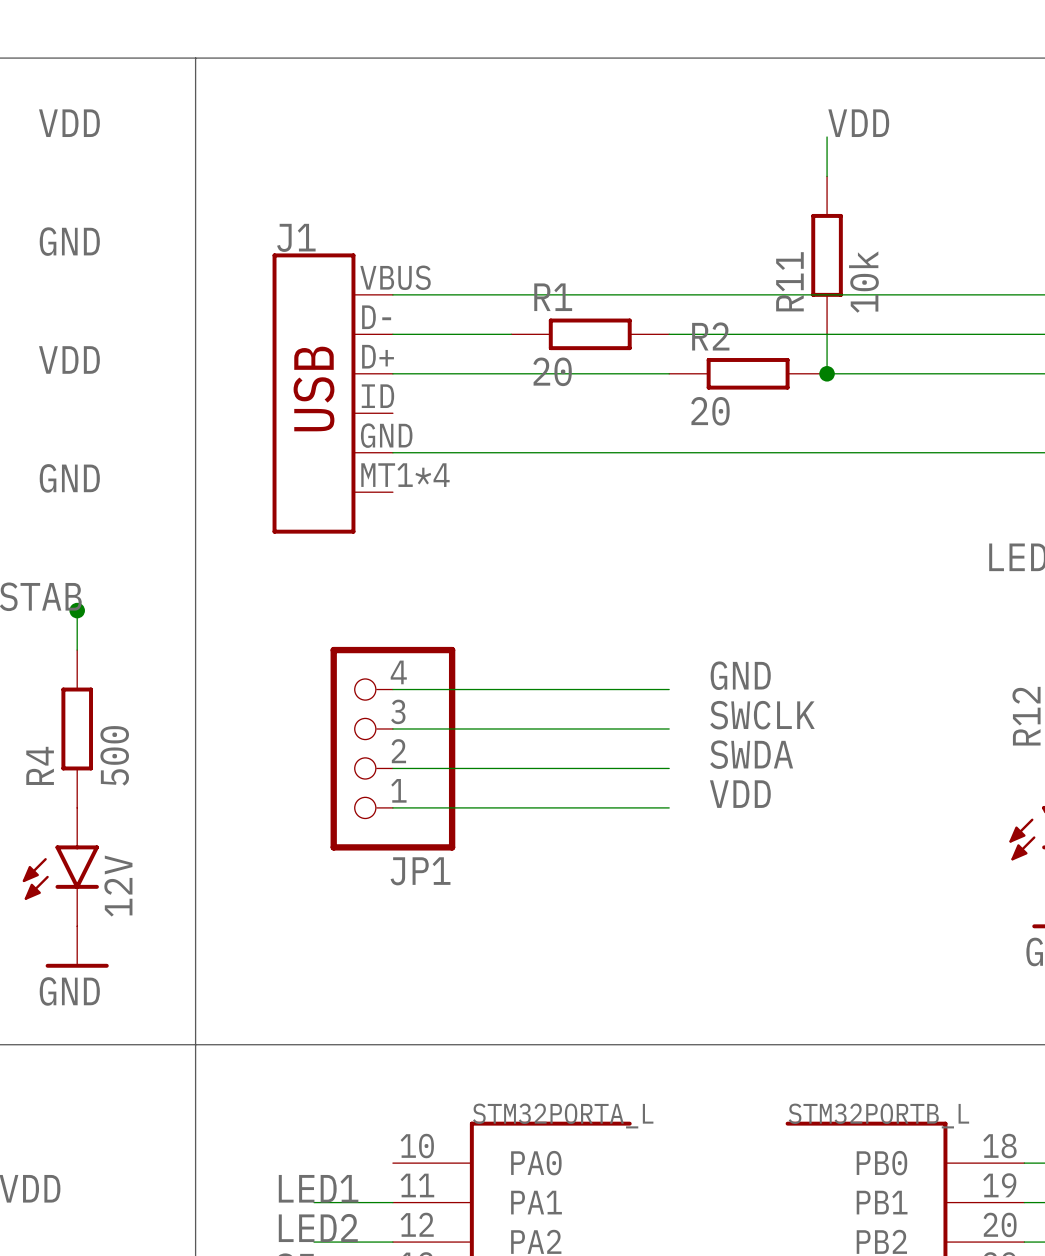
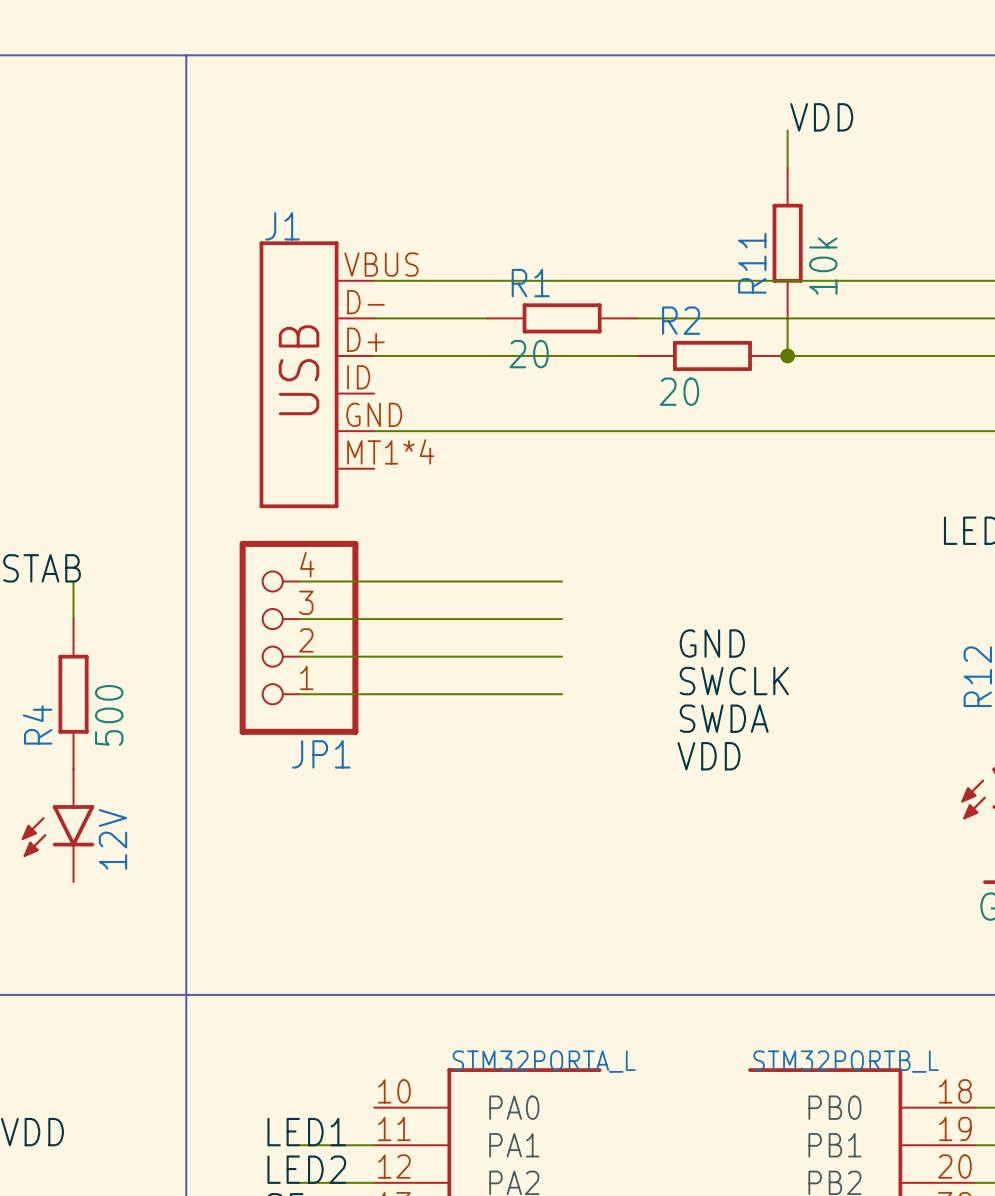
label: VDD (69, 123) -> none
label: GND (69, 241) -> none
label: VDD (69, 359) -> none
label: GND (69, 478) -> none
junction: (77, 610) -> none
wire: (590, 689) (669, 689) -> (299, 656) (374, 656)
wire: (590, 728) (669, 728) -> (299, 694) (374, 694)
JP1 position: (392, 748) -> (299, 637)
wire: (392, 768) (669, 768) -> (299, 581) (562, 581)
wire: (392, 807) (669, 807) -> (299, 619) (562, 619)
power symbol: GND (77, 947) -> none

